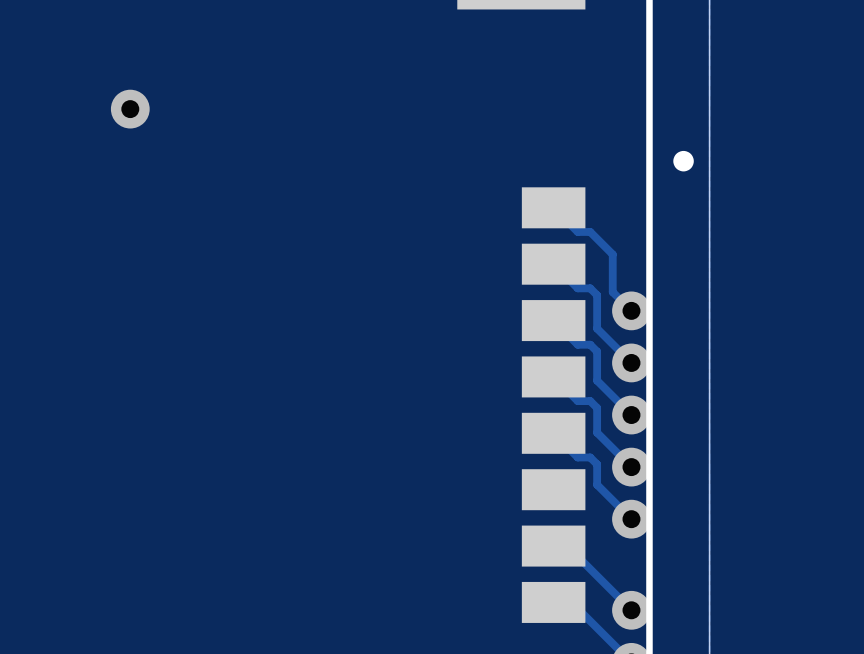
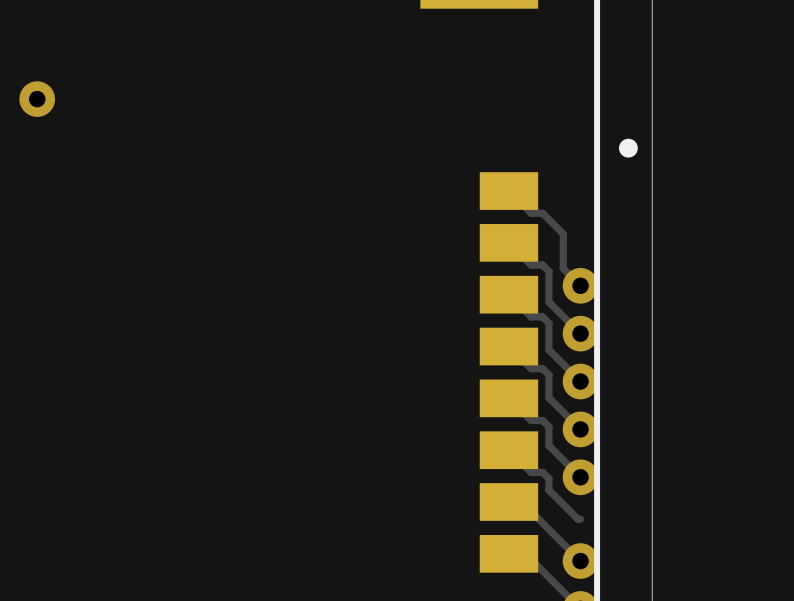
via position: (130, 109) -> (37, 99)
track: none -> (508, 450) (531, 472) (542, 472) (548, 478) (548, 490) (577, 519) (580, 519)

